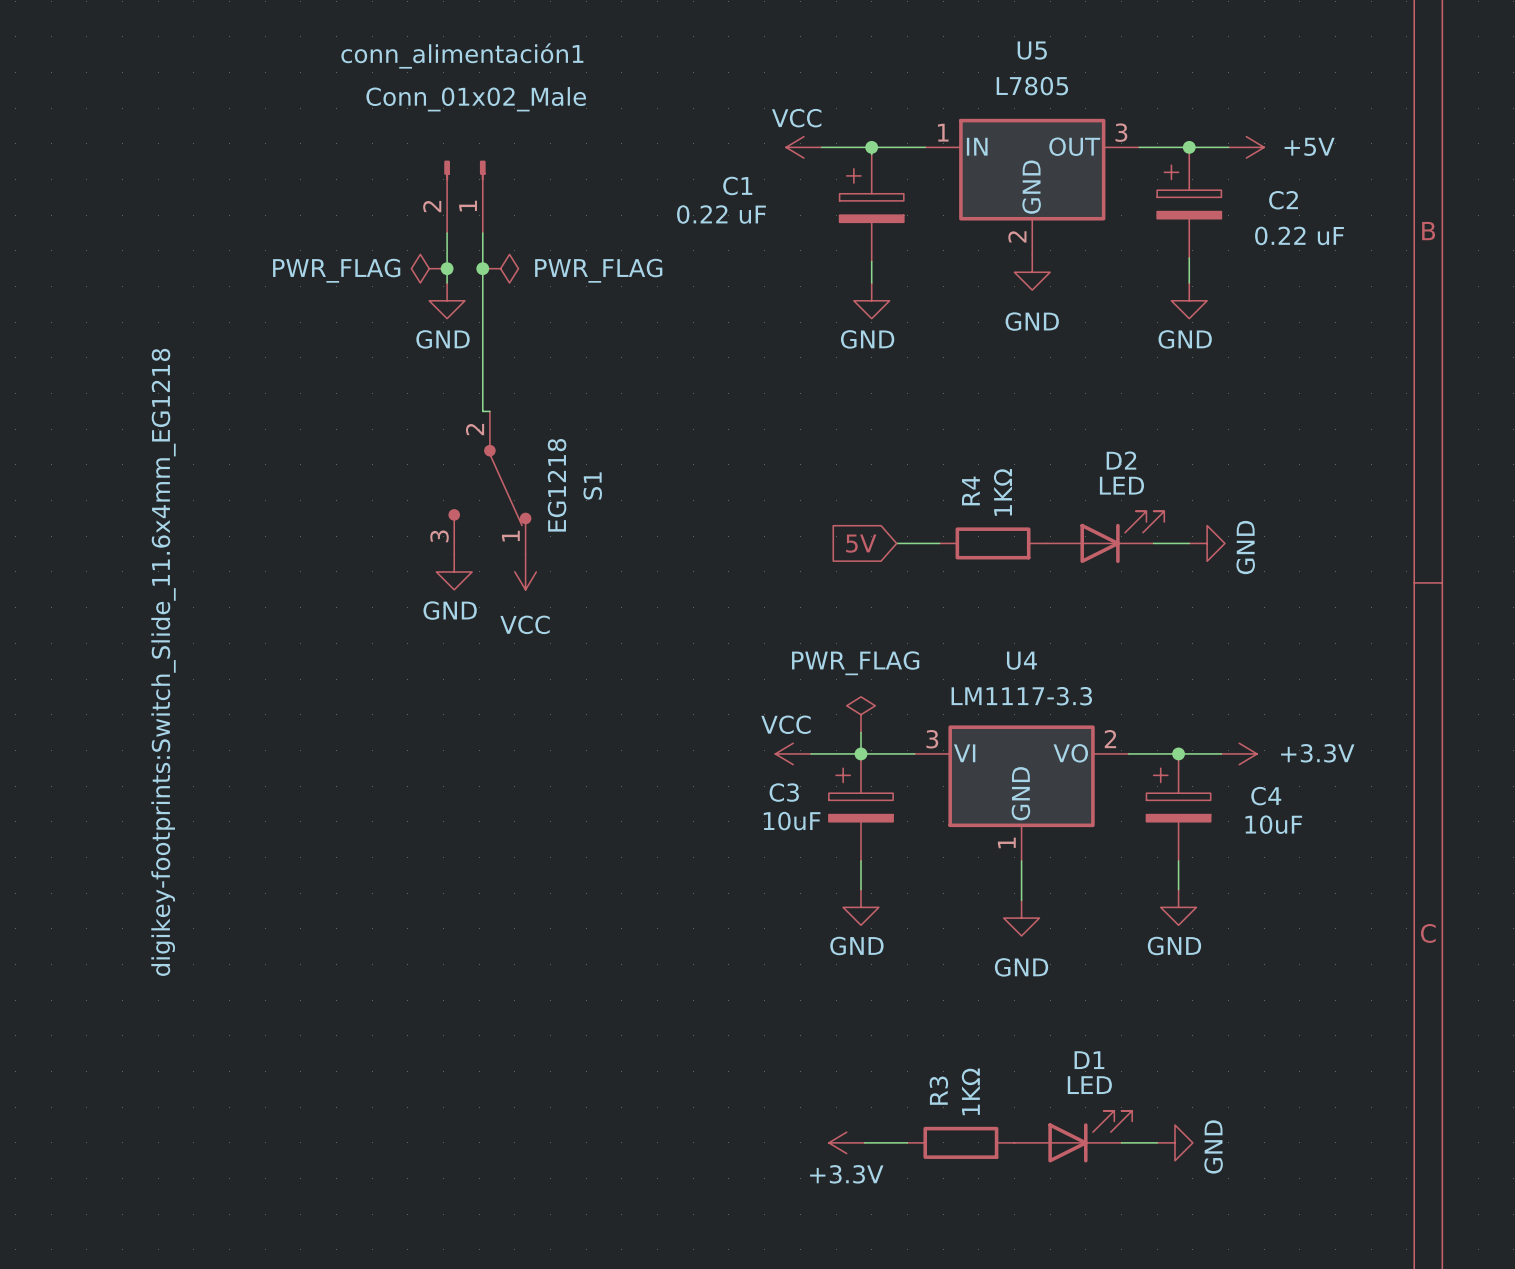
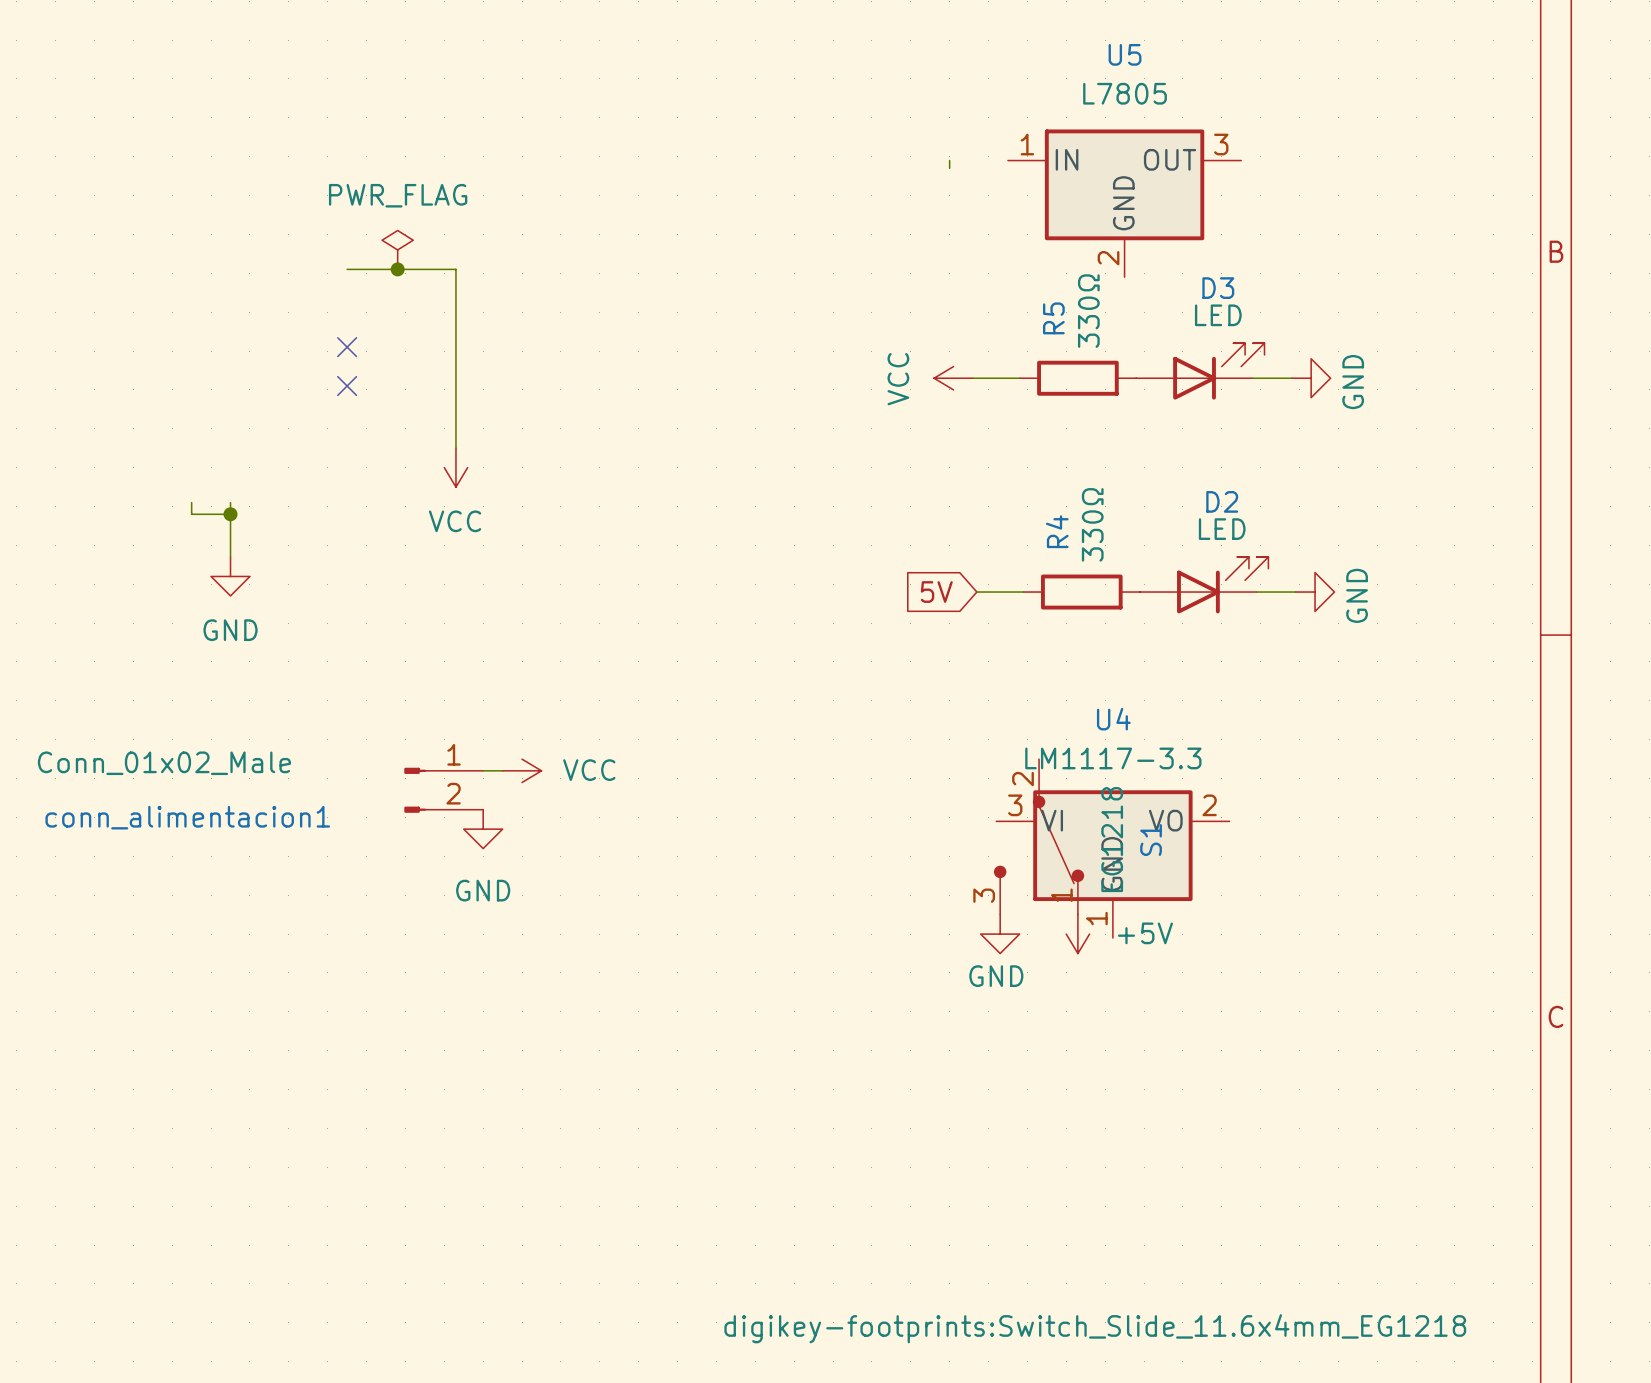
power symbol: VCC (803, 147) -> none
wire: (821, 147) (925, 147) -> none
junction: (871, 147) -> none
wire: (1139, 147) (1228, 147) -> none
junction: (1189, 147) -> none
power symbol: +5V (1246, 147) -> none
conn_alimentación1: Conn_01x02_Male (464, 196) -> none
C2: 0.22 uF (1189, 204) -> none
C1: 0.22 uF (871, 208) -> none
power symbol: none -> PWR_FLAG (397, 249)
wire: (447, 233) (447, 282) -> (230, 502) (230, 557)
wire: (482, 233) (482, 411) (489, 411) -> none
wire: none -> (347, 269) (455, 269) (455, 448)
junction: none -> (397, 269)
wire: (1189, 257) (1189, 282) -> none
wire: (871, 261) (871, 282) -> none
power symbol: PWR_FLAG (429, 268) -> none
junction: (447, 268) -> none
junction: (482, 268) -> none
power symbol: PWR_FLAG (500, 268) -> none
power symbol: GND (1032, 272) -> none
power symbol: GND (447, 300) -> none
power symbol: GND (871, 300) -> none
power symbol rotation: 0° (1189, 300) -> 90° counterclockwise (1311, 378)
power symbol position: GND (1189, 300) -> GND (1311, 378)
no-connect mark: none -> (347, 347)
D3: none -> LED (1200, 371)
power symbol: none -> VCC (953, 378)
wire: none -> (972, 378) (1019, 378)
R5: none -> 330Ω (1077, 378)
wire: none -> (1252, 378) (1291, 378)
no-connect mark: none -> (347, 386)
power symbol: none -> VCC (455, 467)
wire: none -> (191, 502) (191, 514) (230, 514)
junction: none -> (230, 514)
S1 position: (489, 482) -> (1039, 836)
R4 value: 1KΩ (1002, 492) -> 330Ω (1092, 524)
power symbol: none -> GND (230, 576)
power symbol: GND (454, 571) -> none
power symbol: VCC (525, 571) -> none
S1 text rotation: 0° (163, 662) -> 90° clockwise (1095, 1328)
wire: none -> (483, 770) (502, 770)
power symbol: none -> VCC (522, 770)
power symbol: PWR_FLAG (861, 714) -> none
conn_alimentacion1: none -> Conn_01x02_Male (443, 790)
wire: (861, 732) (861, 753) -> none
power symbol: VCC (793, 753) -> none
wire: (811, 753) (914, 753) -> none
junction: (861, 753) -> none
wire: (1128, 753) (1221, 753) -> none
junction: (1178, 753) -> none
power symbol: +3.3V (1239, 753) -> none
power symbol: none -> GND (483, 829)
C3: 10uF (861, 807) -> none
C4: 10uF (1178, 807) -> none
power symbol: none -> GND (1000, 934)
power symbol: none -> +5V (1077, 934)
wire: (861, 861) (861, 889) -> none
wire: (1021, 861) (1021, 900) -> none
wire: (1178, 861) (1178, 889) -> none
power symbol: GND (861, 907) -> none
power symbol: GND (1178, 907) -> none
power symbol: GND (1021, 918) -> none
D1: LED (1073, 1136) -> none
power symbol: +3.3V (846, 1142) -> none
wire: (864, 1142) (907, 1142) -> none
R3: 1KΩ (960, 1142) -> none
wire: (1121, 1142) (1157, 1142) -> none
power symbol: GND (1174, 1142) -> none

